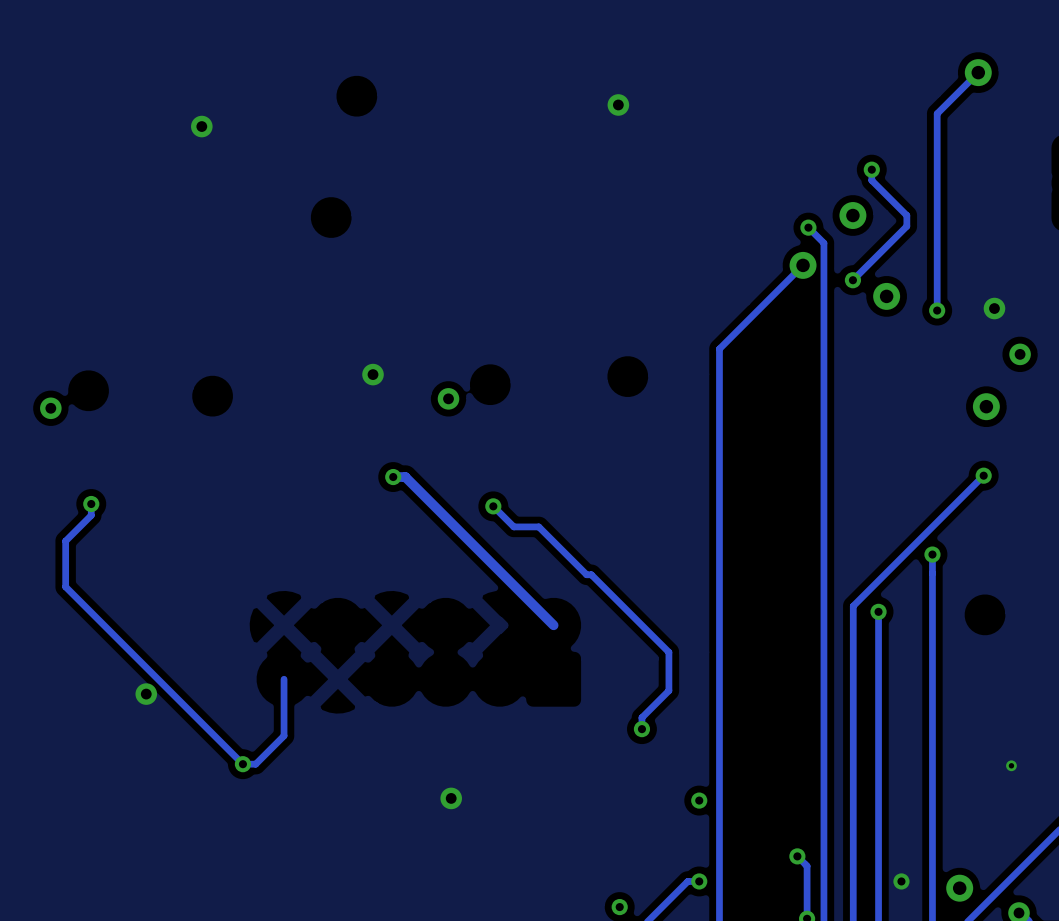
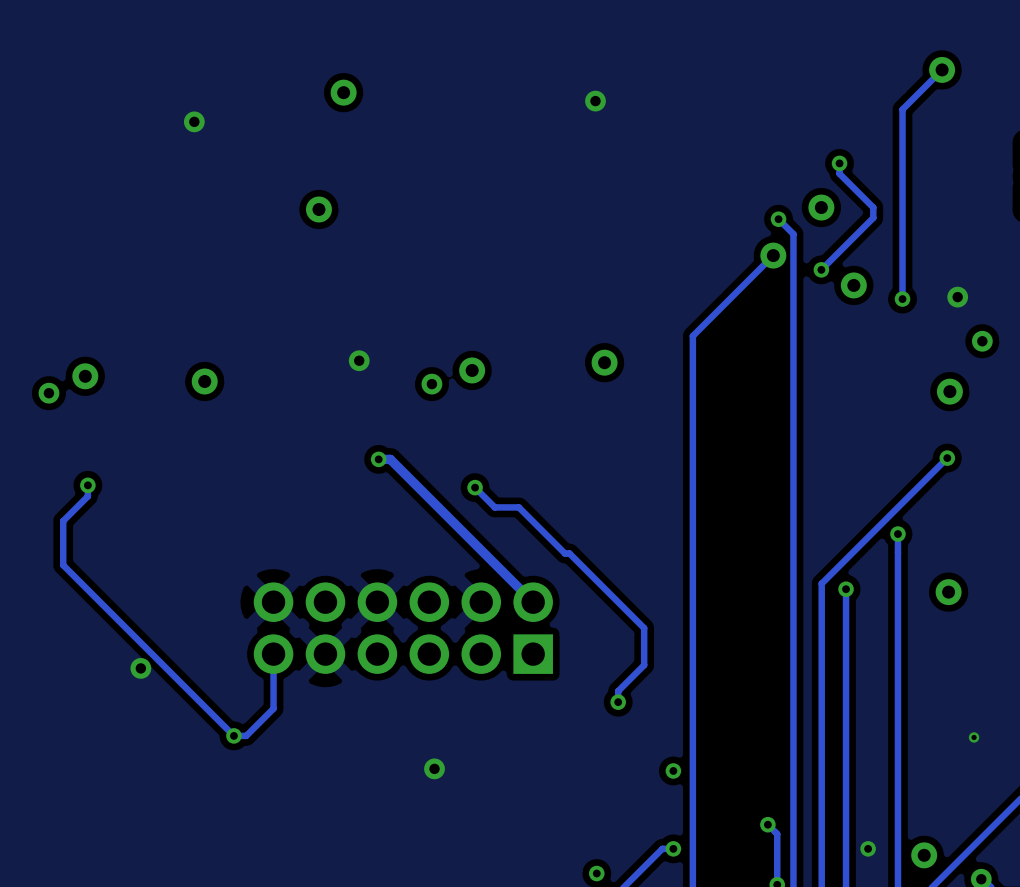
part: none -> (343, 92)
part: none -> (318, 209)
part: none -> (604, 362)
part: none -> (472, 370)
part: none -> (85, 376)
part: none -> (204, 381)
part: none -> (948, 592)
part: none -> (403, 628)

